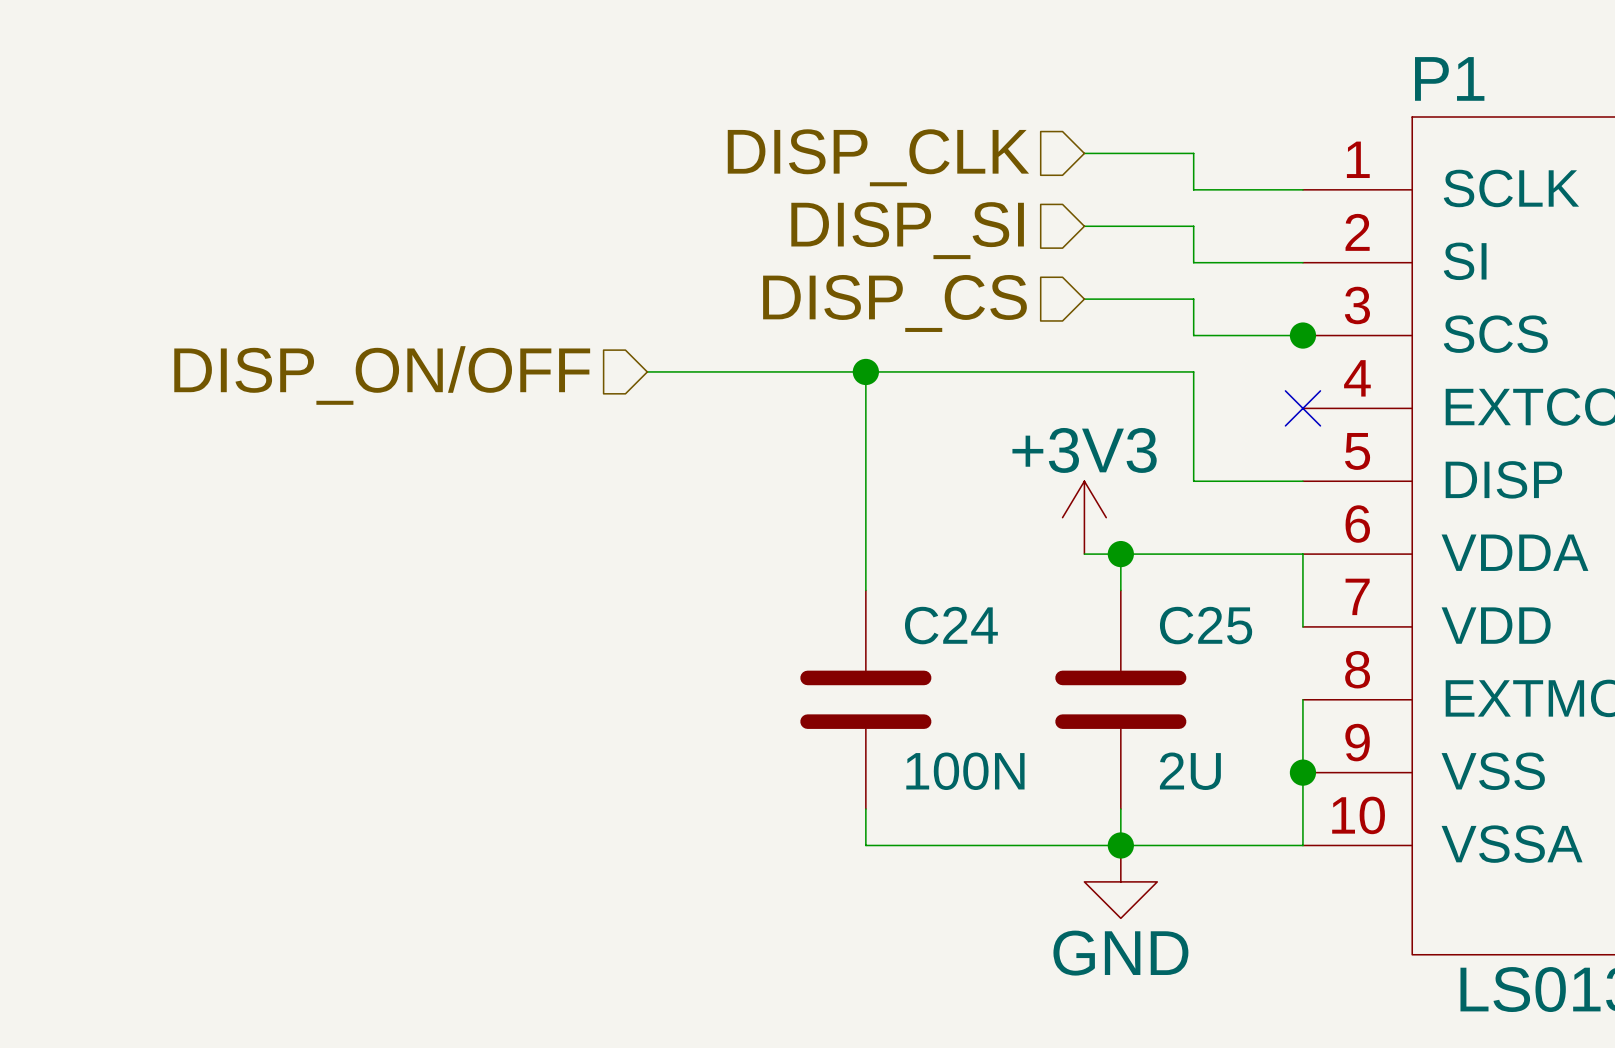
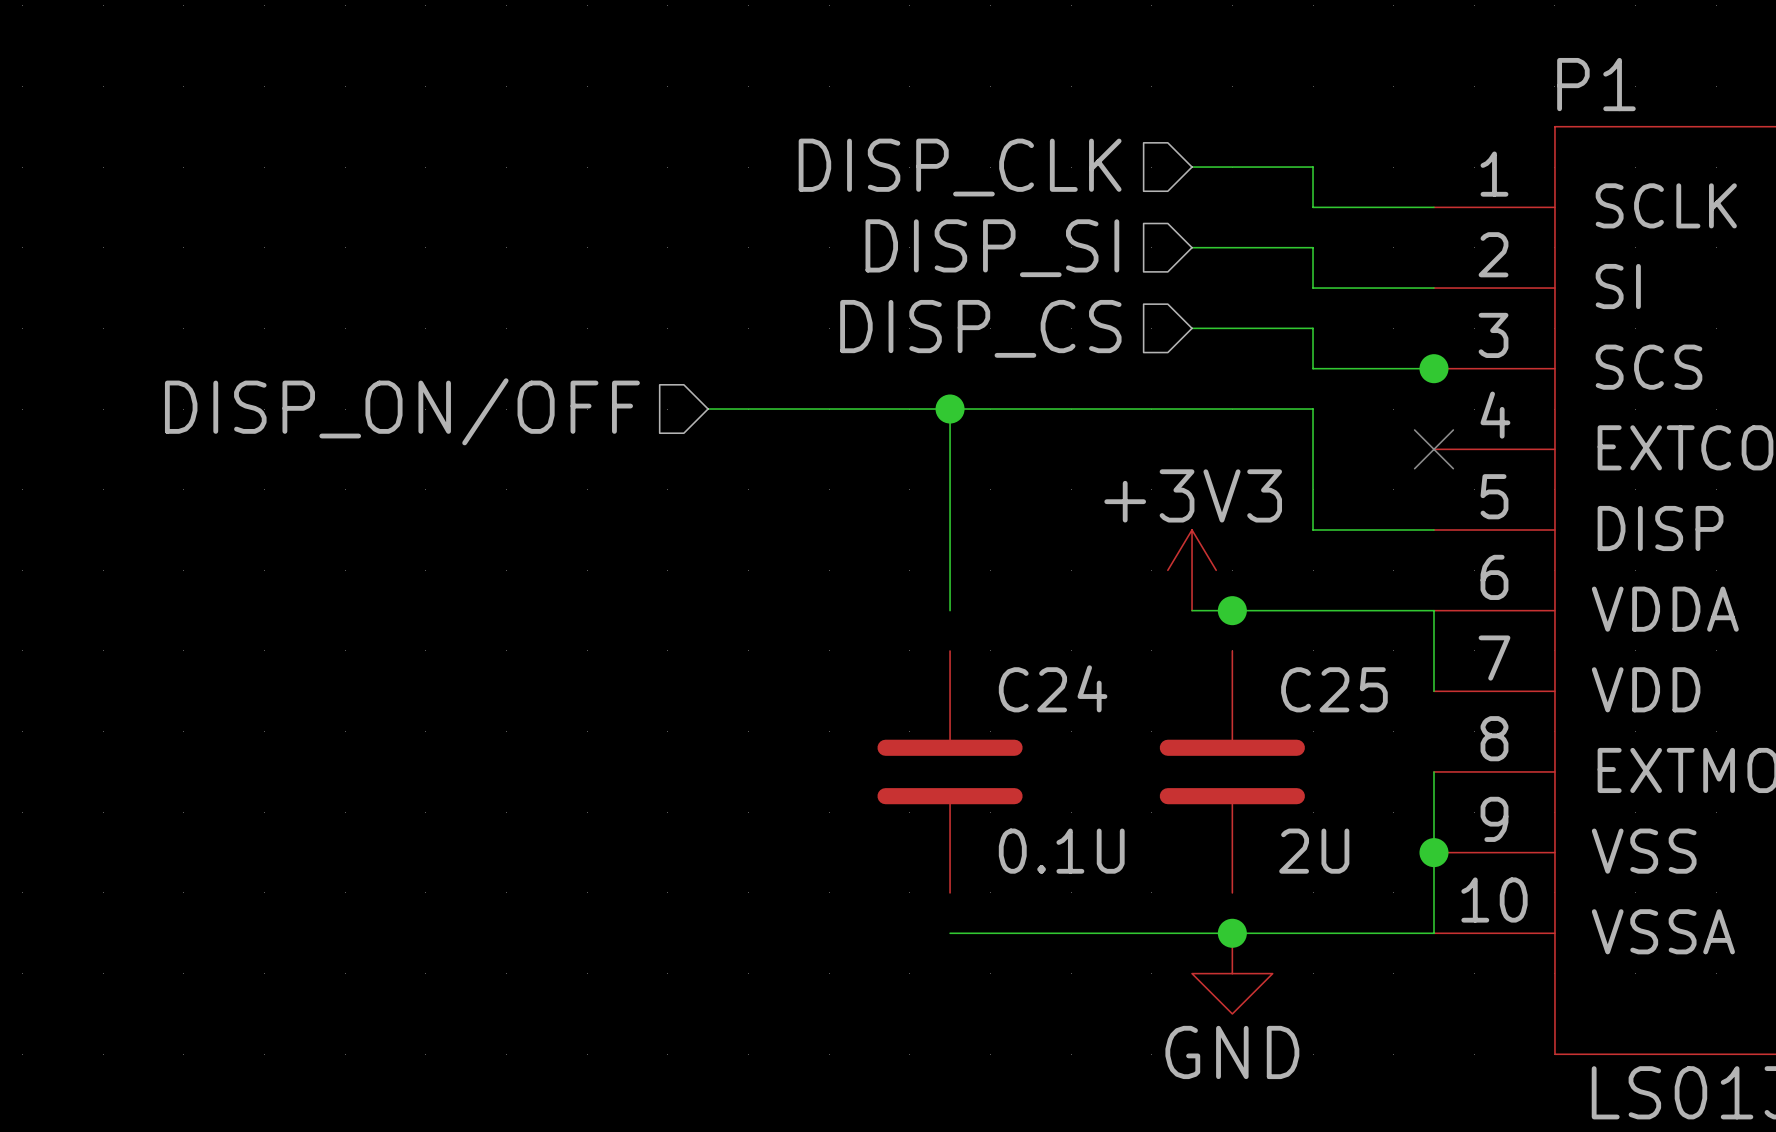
wire: (865, 554) (865, 590) -> none
wire: (1120, 554) (1120, 590) -> none
C24 value: 100N (965, 771) -> 0.1U (1061, 851)
wire: (865, 809) (865, 845) -> none
wire: (1120, 809) (1120, 845) -> none

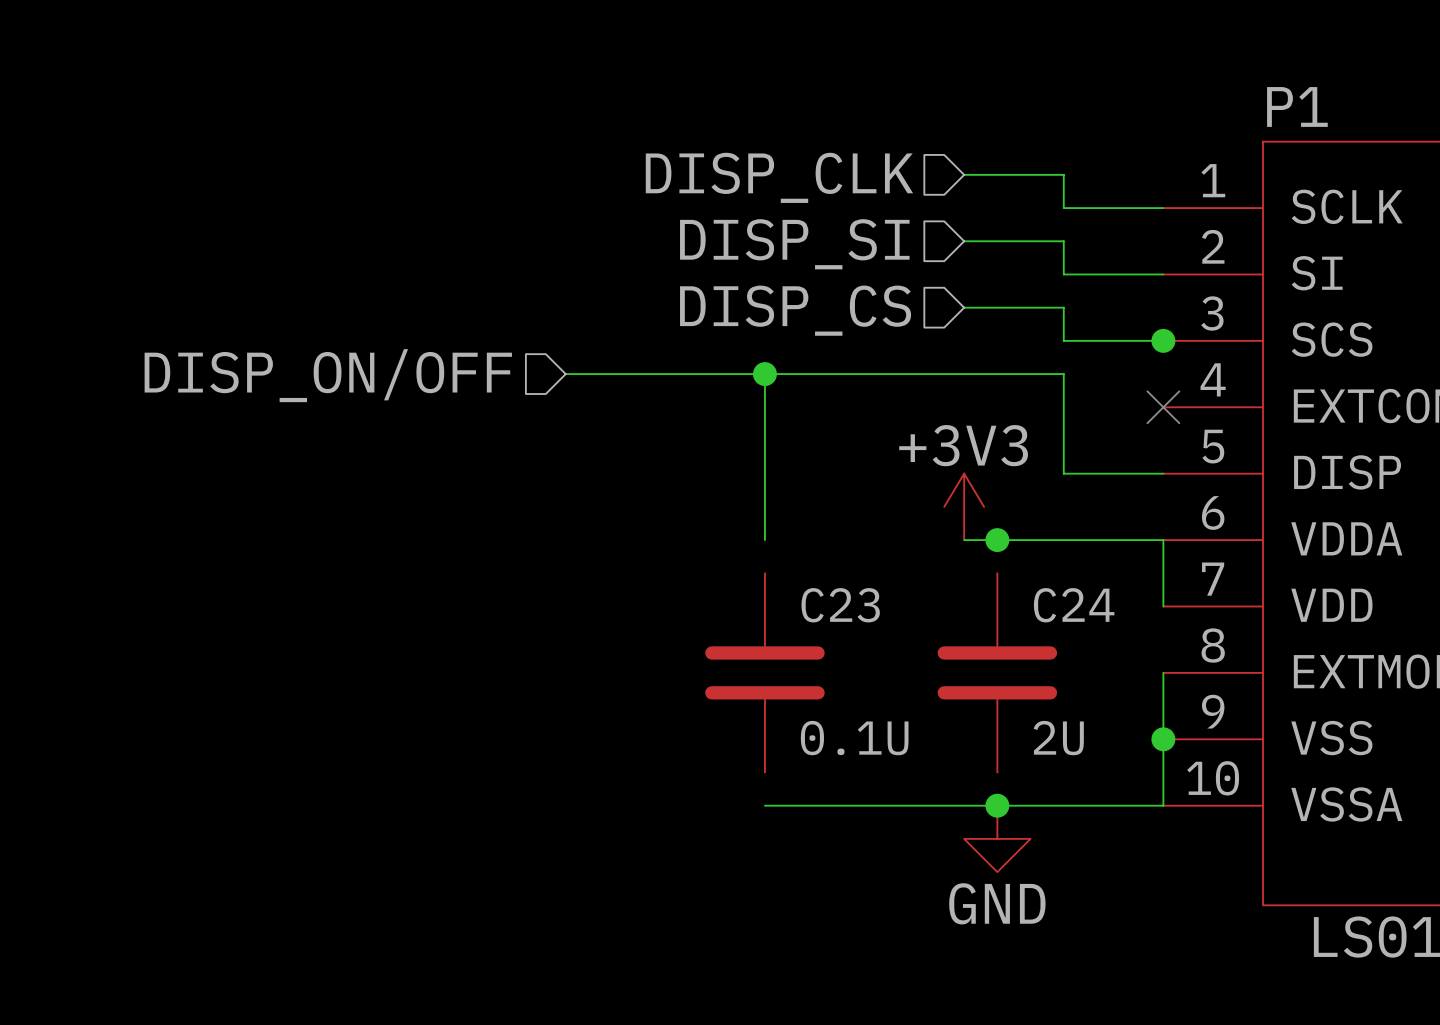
C24 name: C24 (1053, 688) -> C23 (840, 605)
C25 name: C25 (1334, 689) -> C24 (1074, 605)

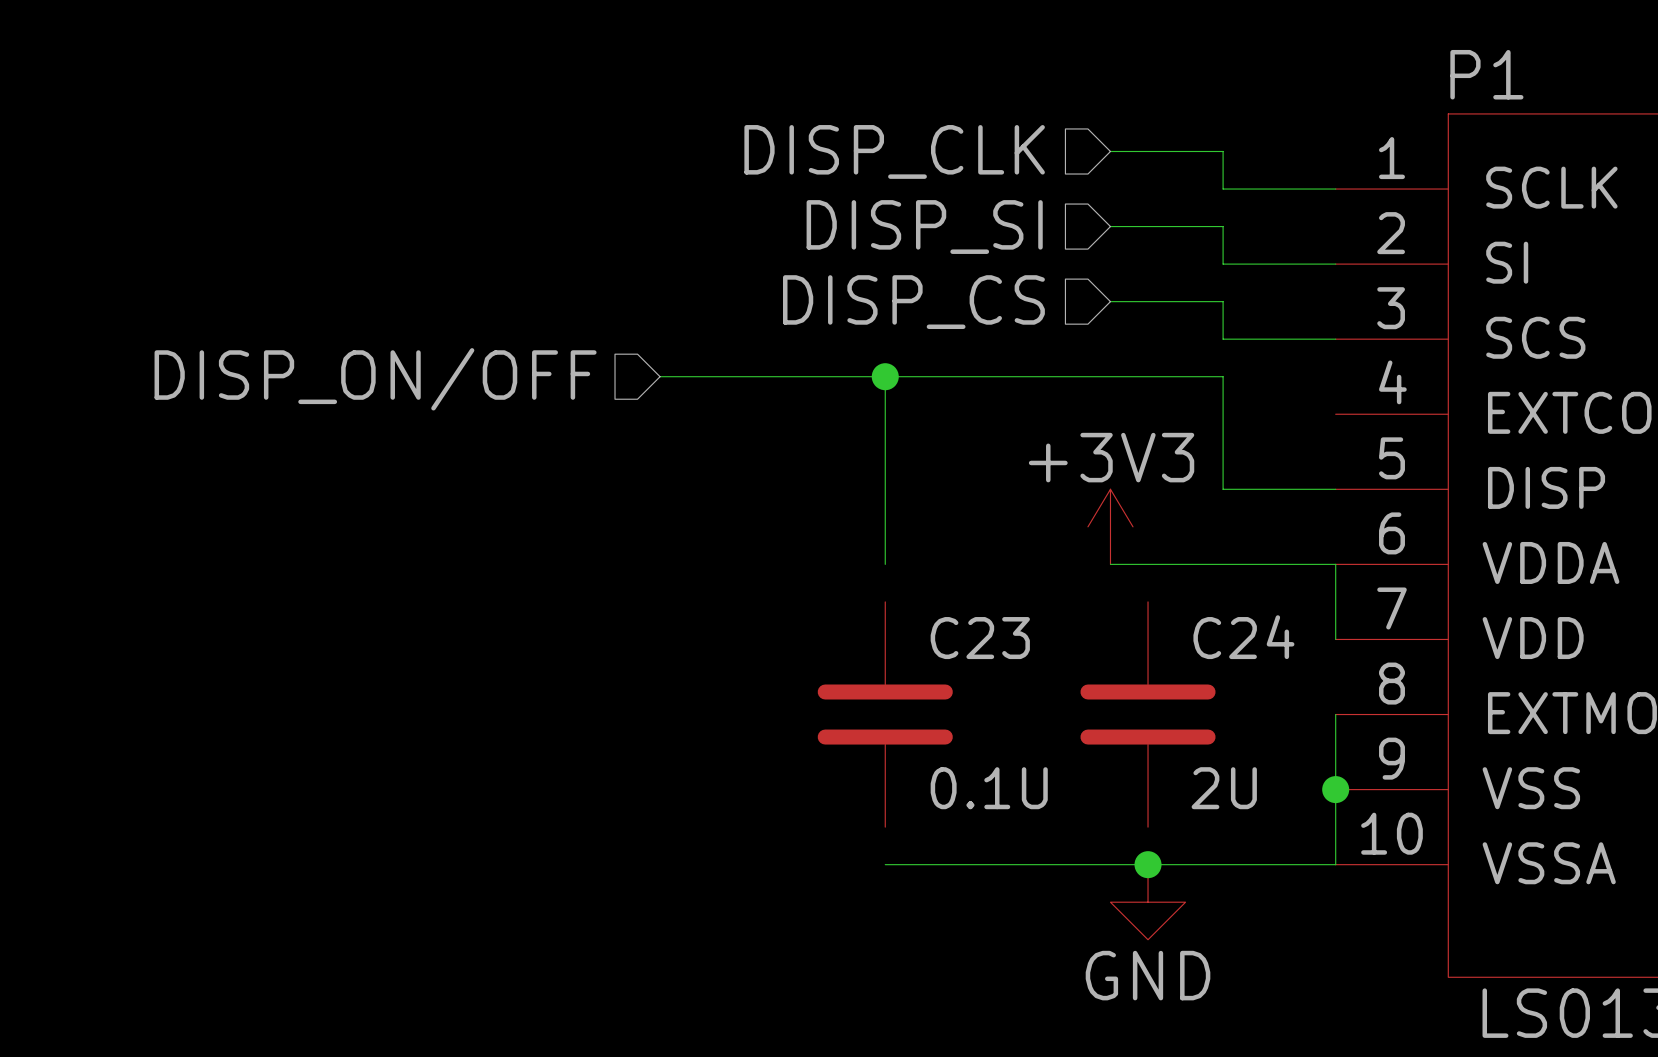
junction: (1163, 340) -> none
no-connect mark: (1163, 407) -> none
junction: (997, 540) -> none

